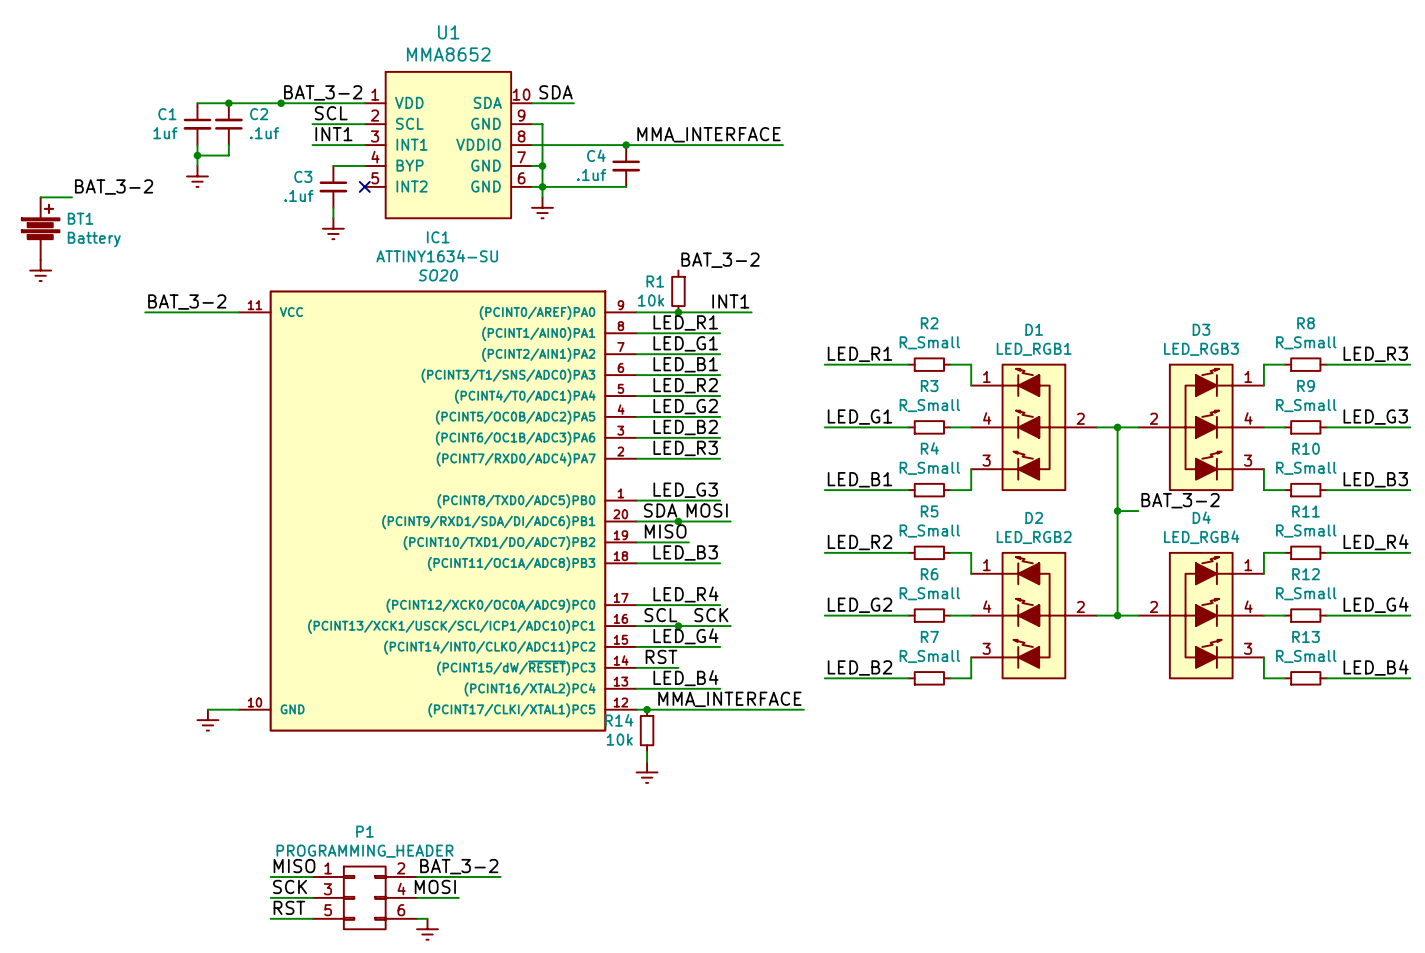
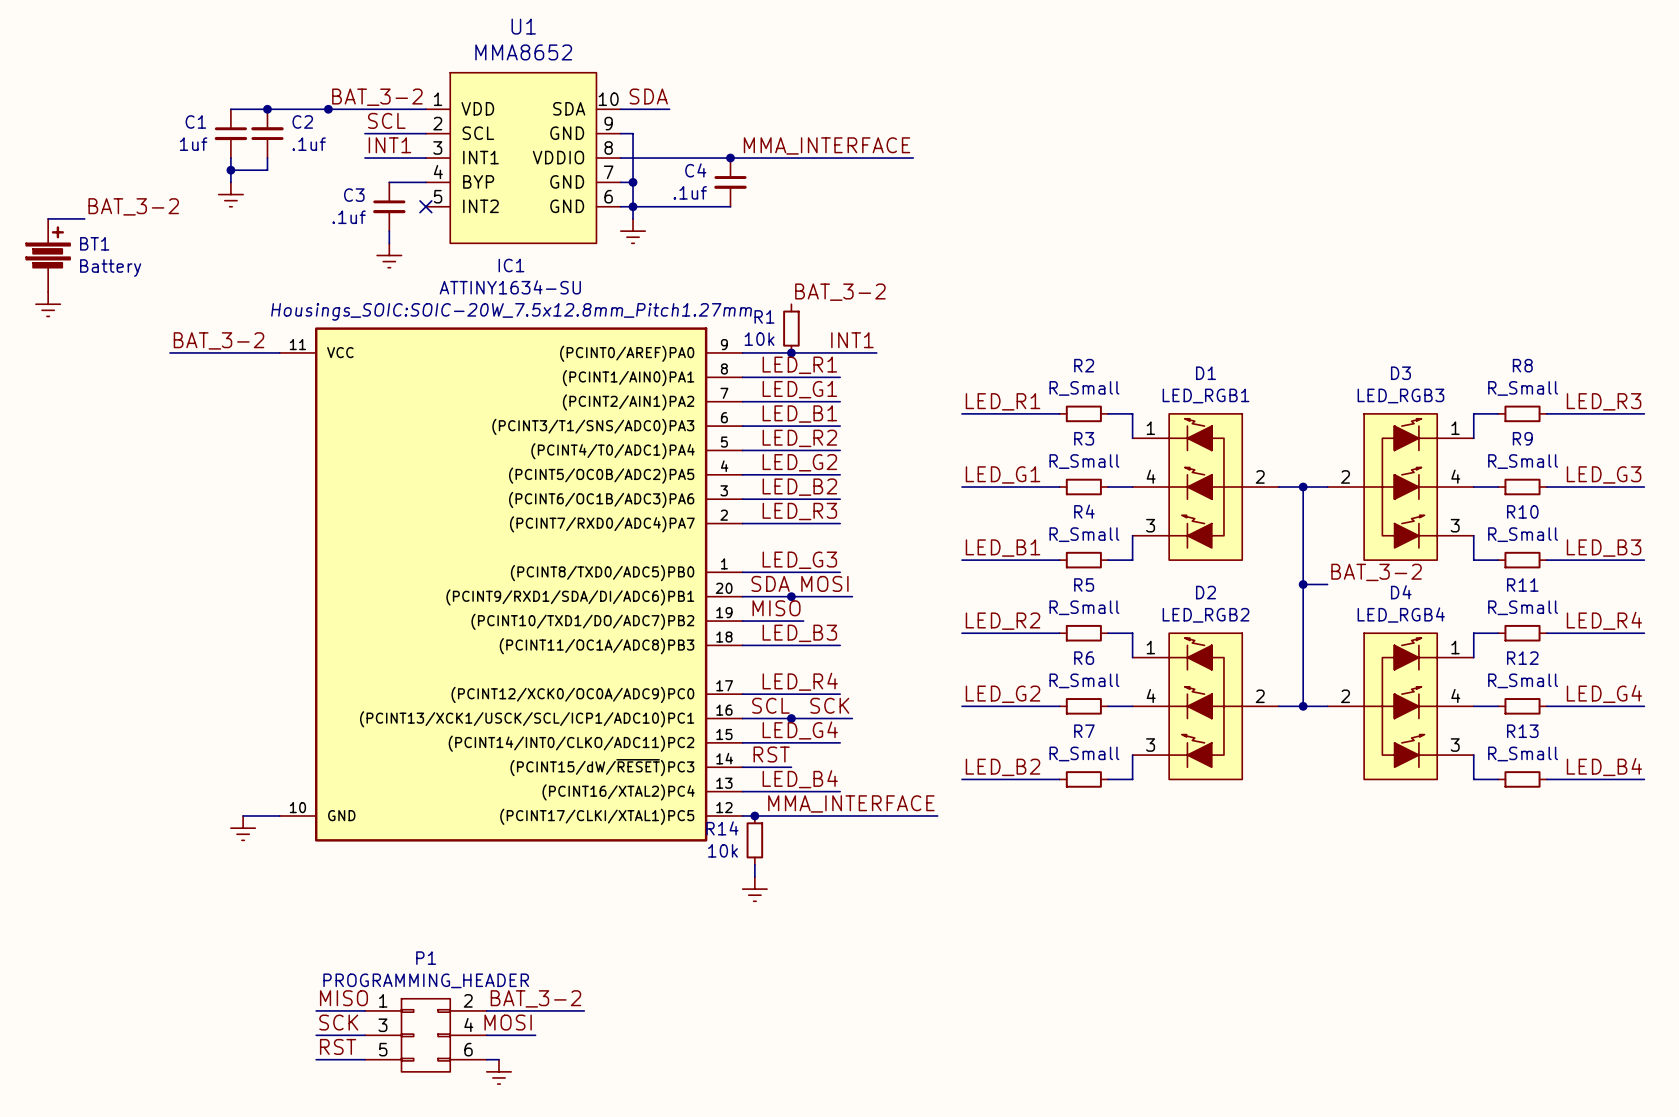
IC1 text: SO20 (438, 275) -> Housings_SOIC:SOIC-20W_7.5x12.8mm_Pitch1.27mm (511, 311)

